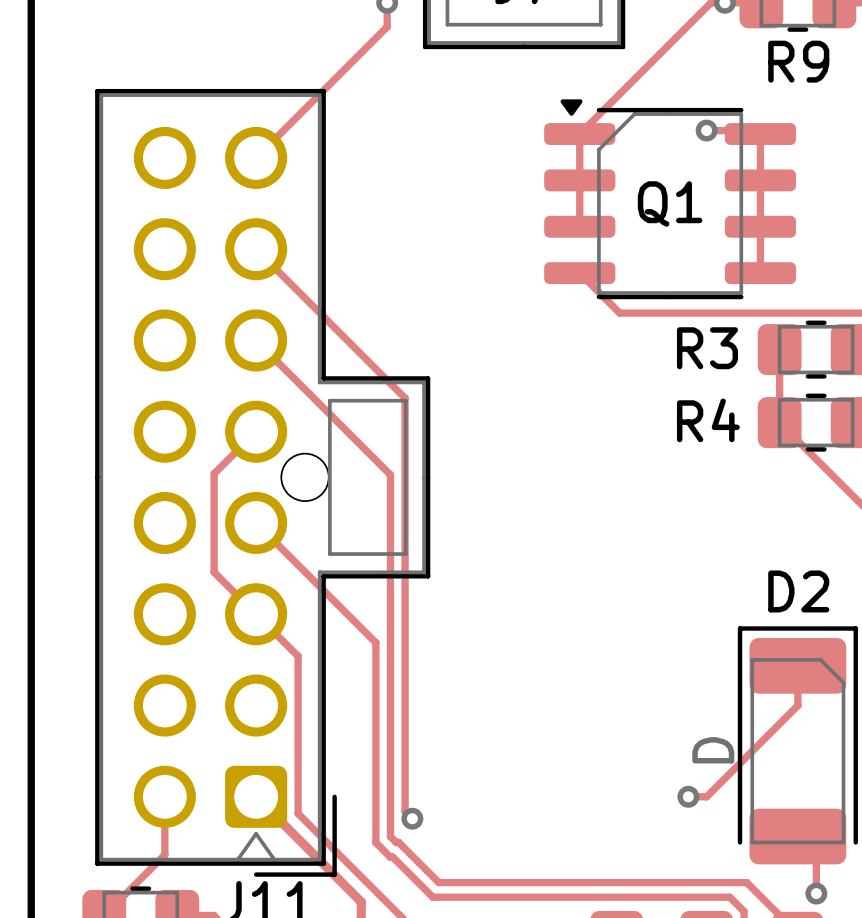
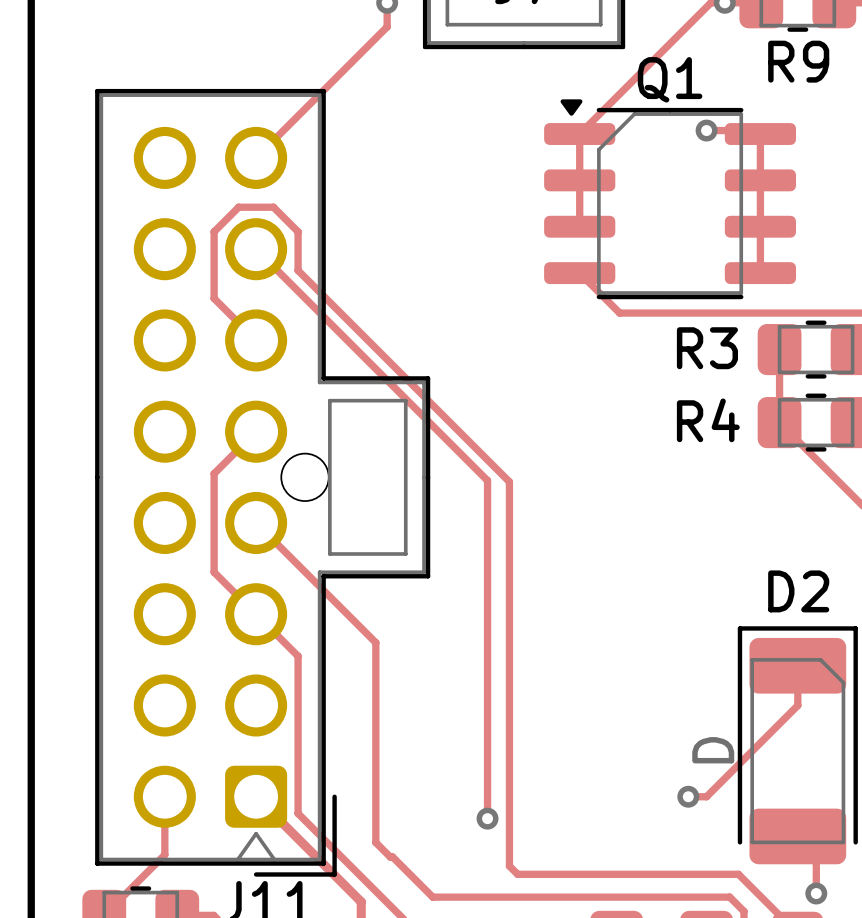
Q1 name position: Q1 (670, 203) -> Q1 (670, 79)
track: (256, 340) (390, 474) (390, 836) (438, 882) (746, 882) -> (256, 340) (214, 298) (214, 231) (238, 207) (273, 207) (298, 231) (298, 270) (509, 481) (509, 866) (517, 874) (738, 874) (746, 882)
track: (405, 398) (405, 811) (412, 818) -> (405, 398) (487, 480) (487, 818)
via: (412, 818) -> none
via: none -> (487, 818)

